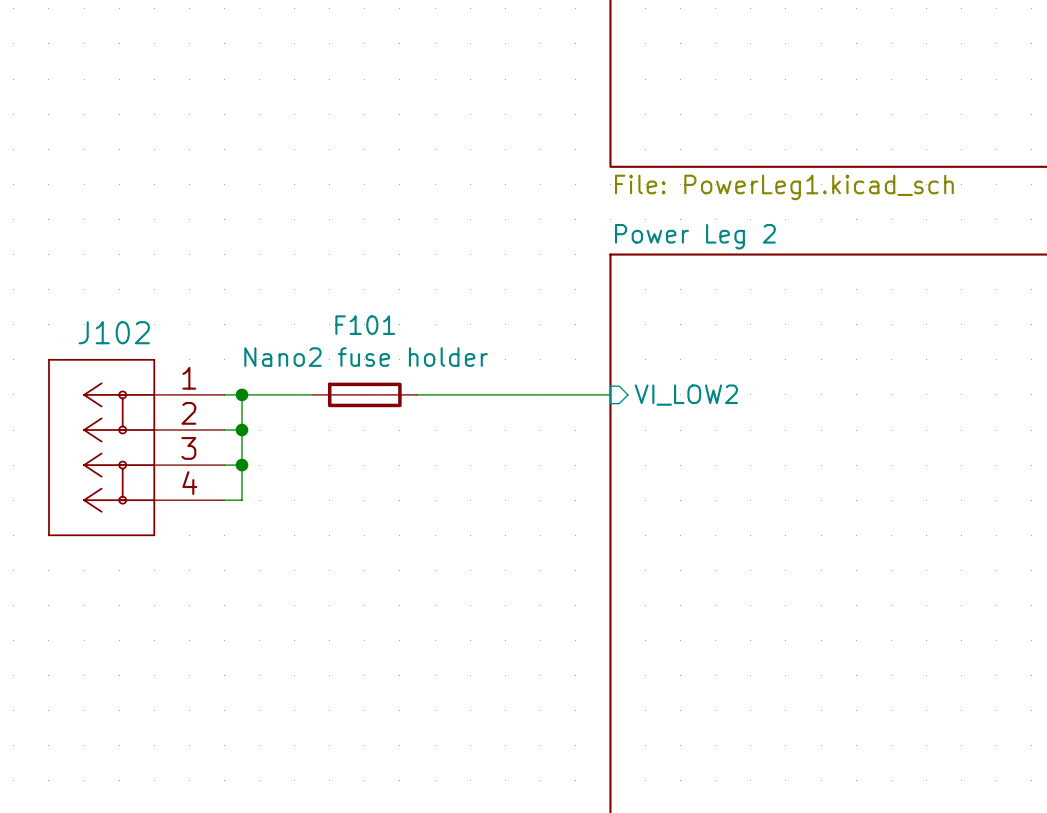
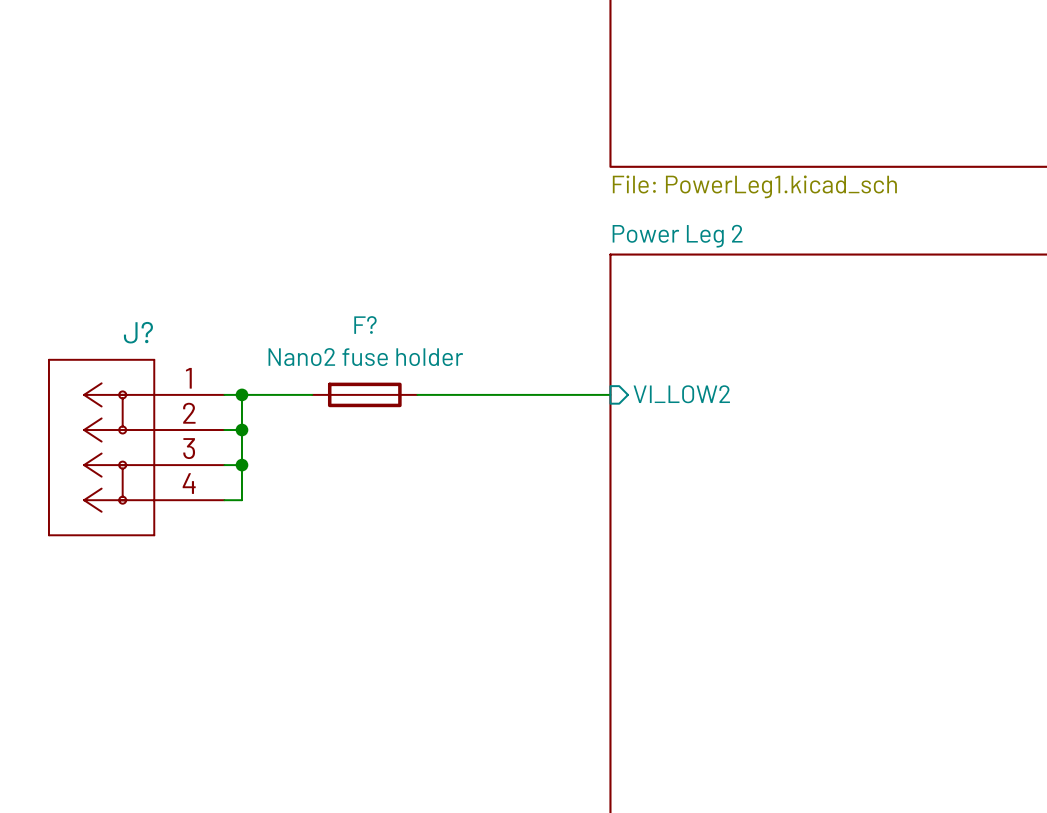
F101 name: F101 (365, 325) -> F? (365, 325)
J102 name: J102 (114, 332) -> J? (138, 332)

